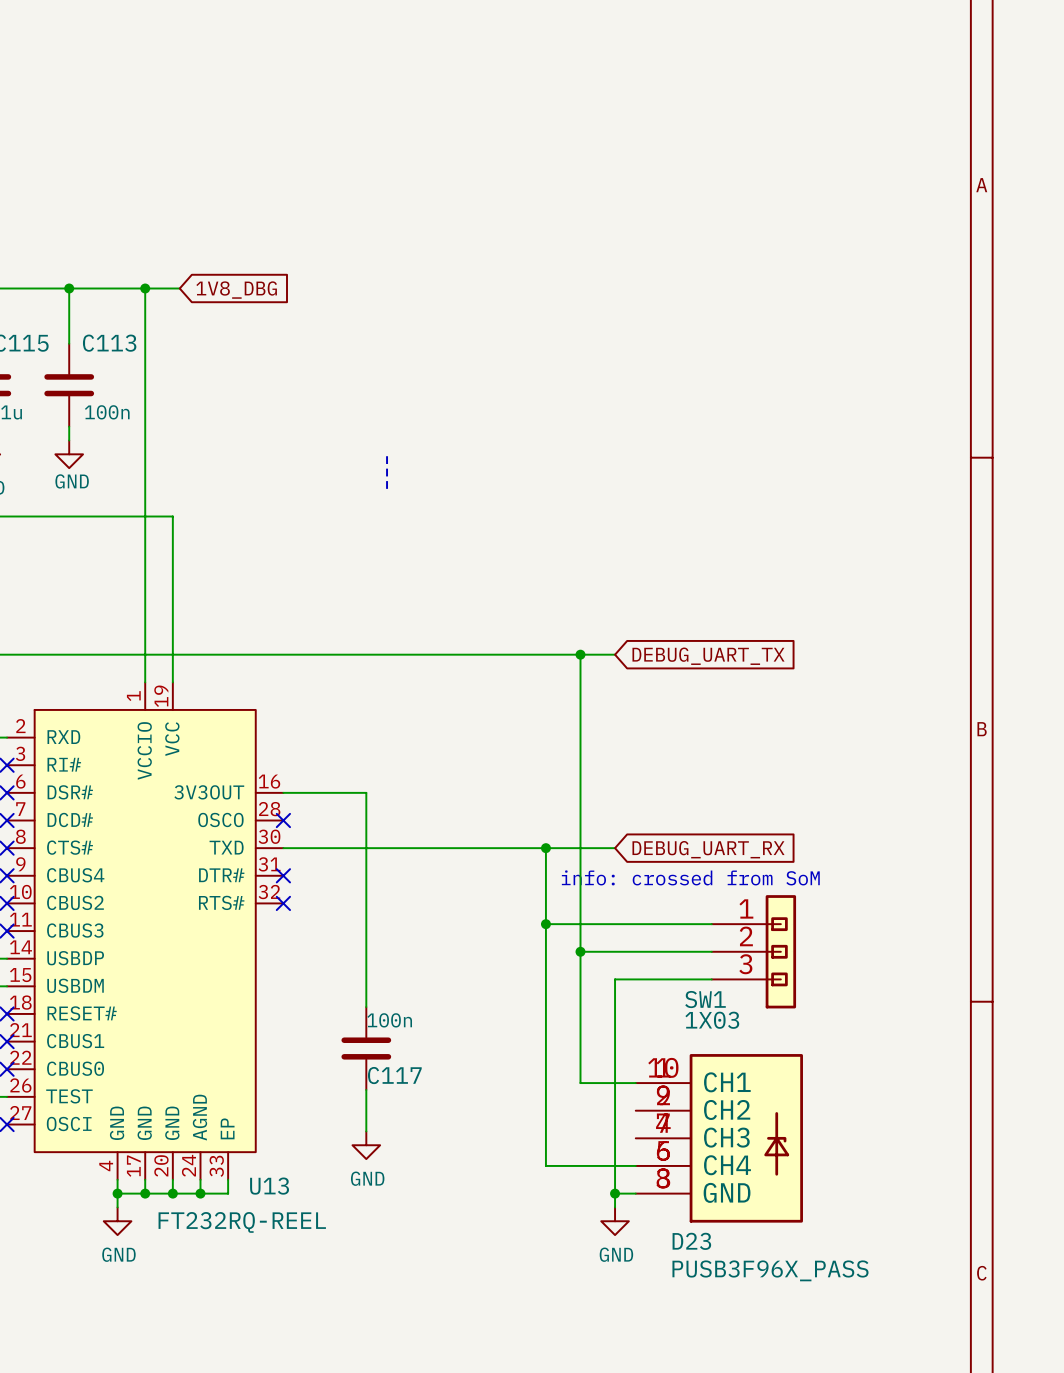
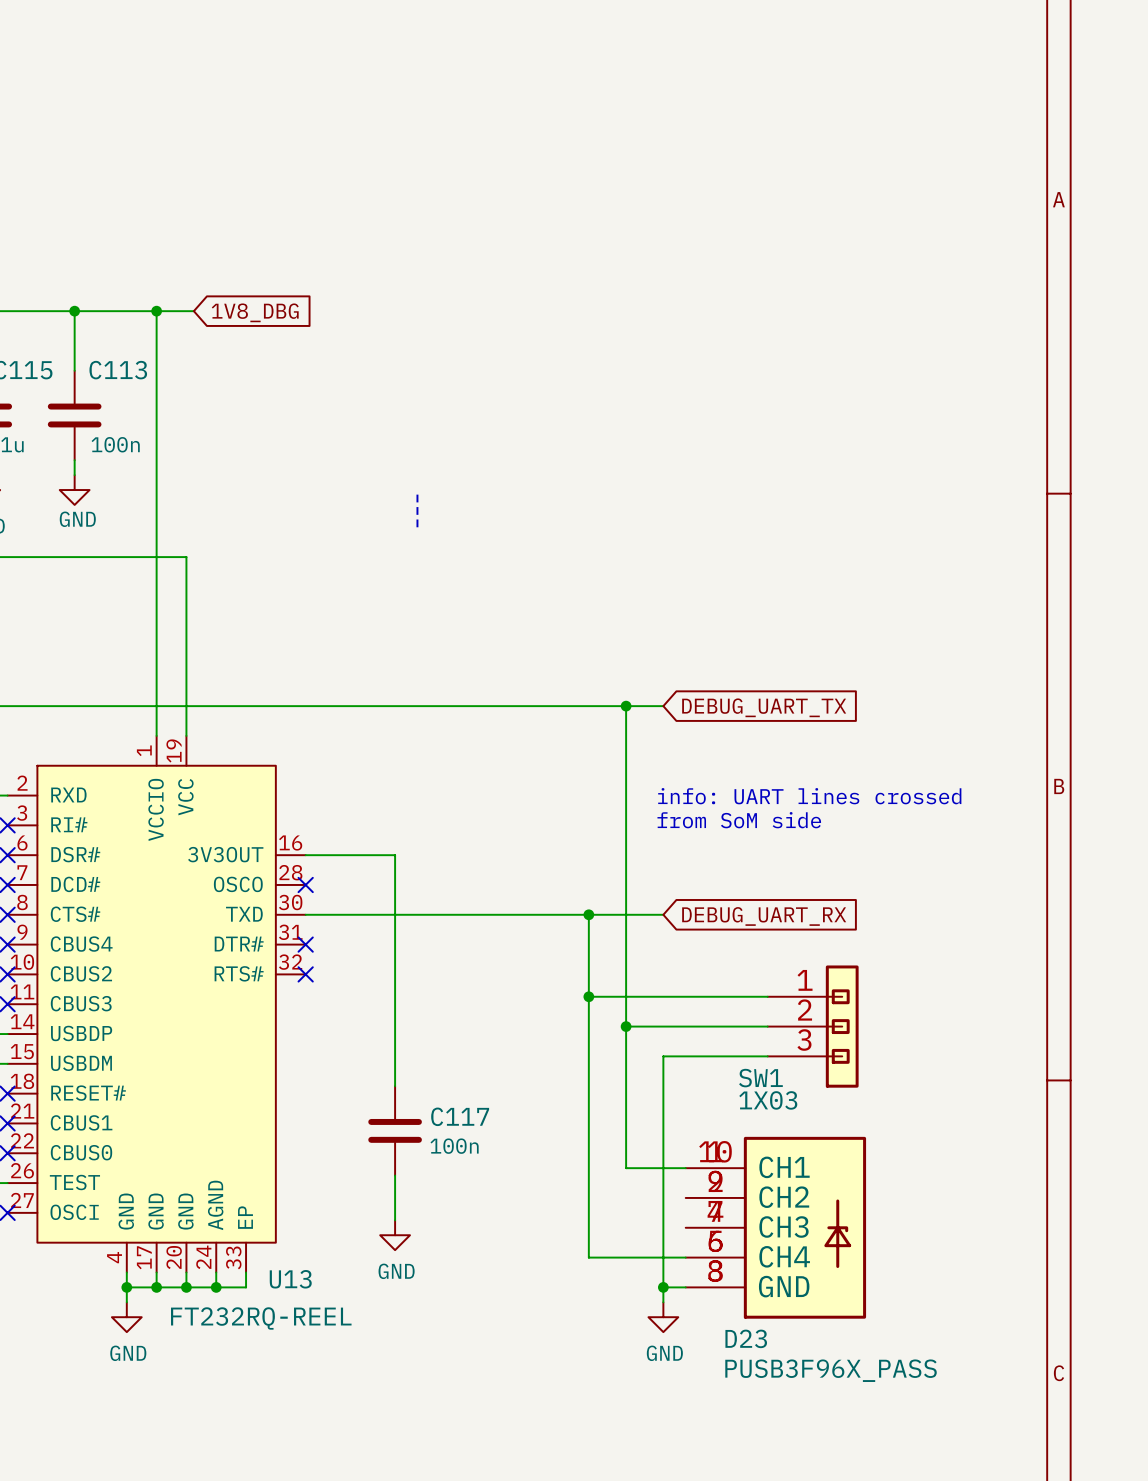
text: none -> info: UART lines crossed (809, 796)
text: none -> from SoM side (739, 820)
text: info: crossed from SoM (690, 877) -> none
C117 text position: 100n (389, 1020) -> 100n (454, 1146)
C117 name position: C117 (394, 1075) -> C117 (460, 1116)

